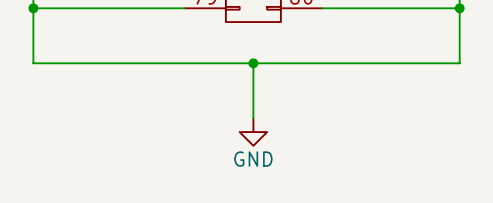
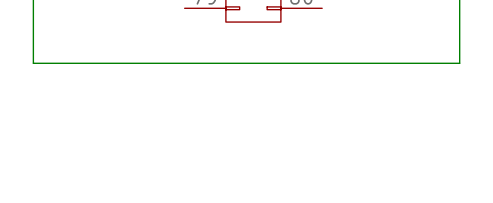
wire: (33, 8) (184, 8) -> none
junction: (33, 8) -> none
wire: (322, 8) (459, 8) -> none
junction: (459, 8) -> none
wire: (253, 63) (253, 118) -> none
junction: (253, 63) -> none
power symbol: GND (253, 132) -> none

